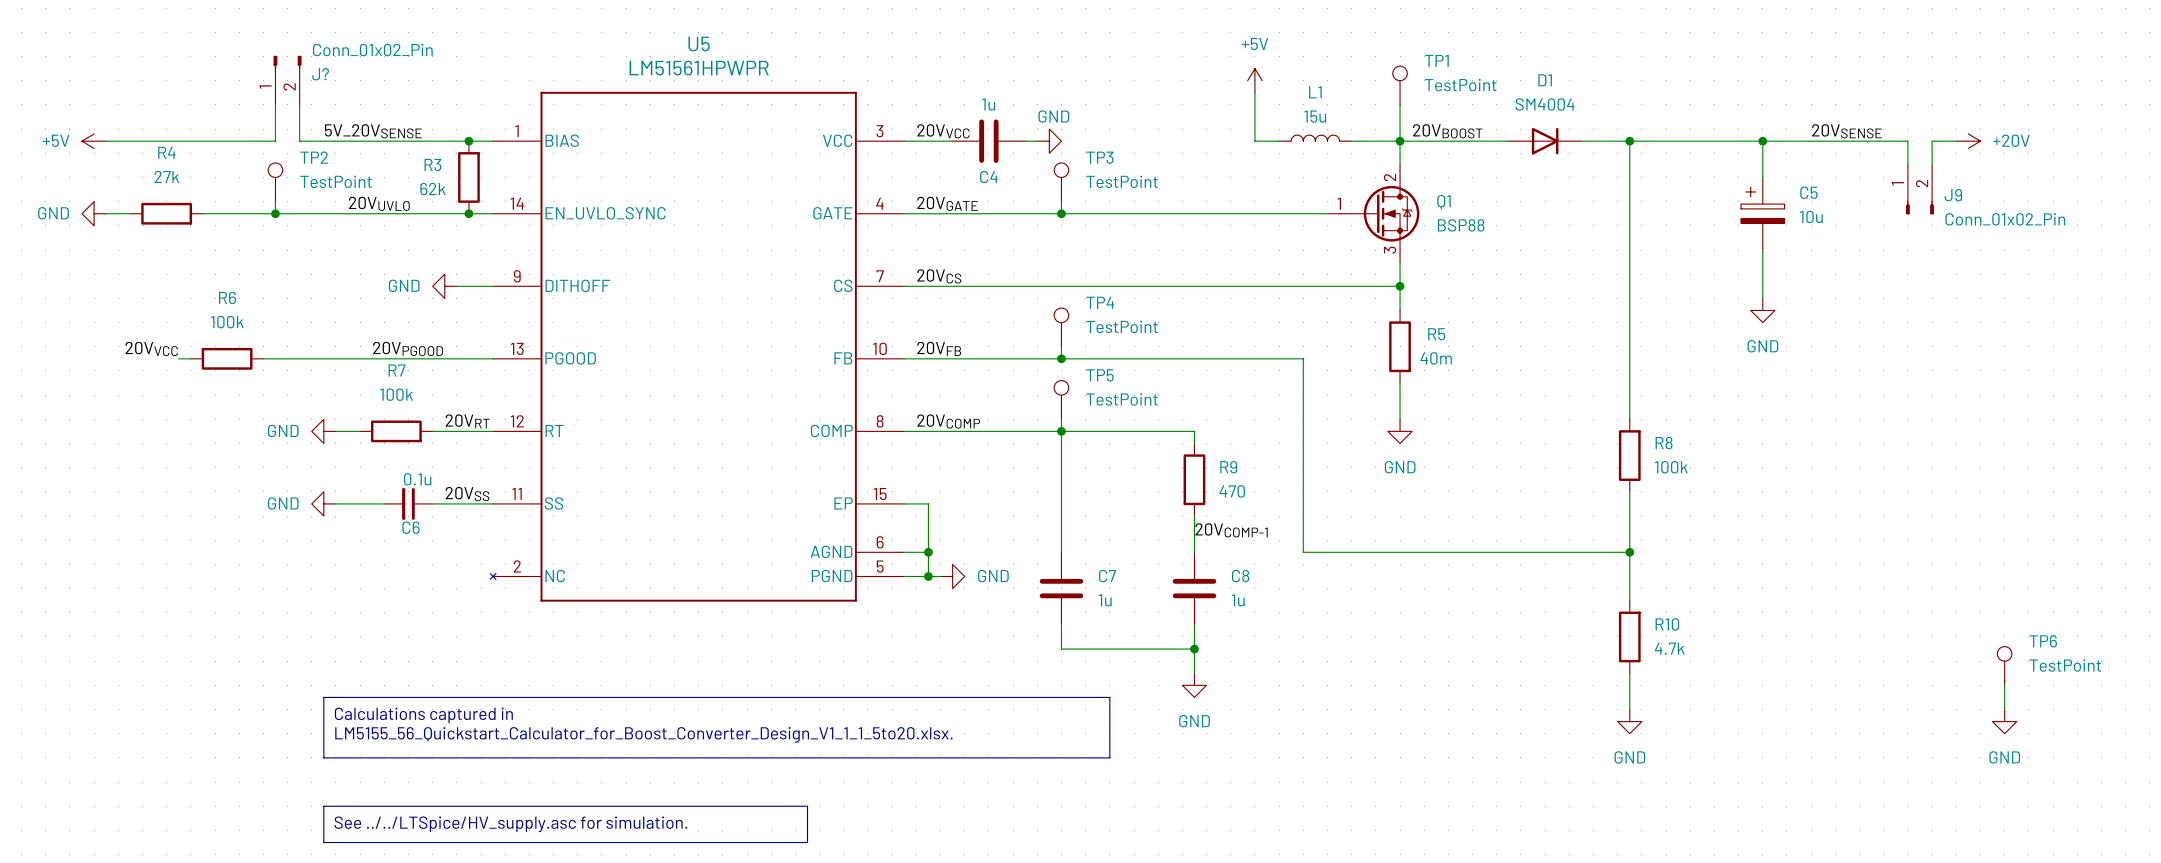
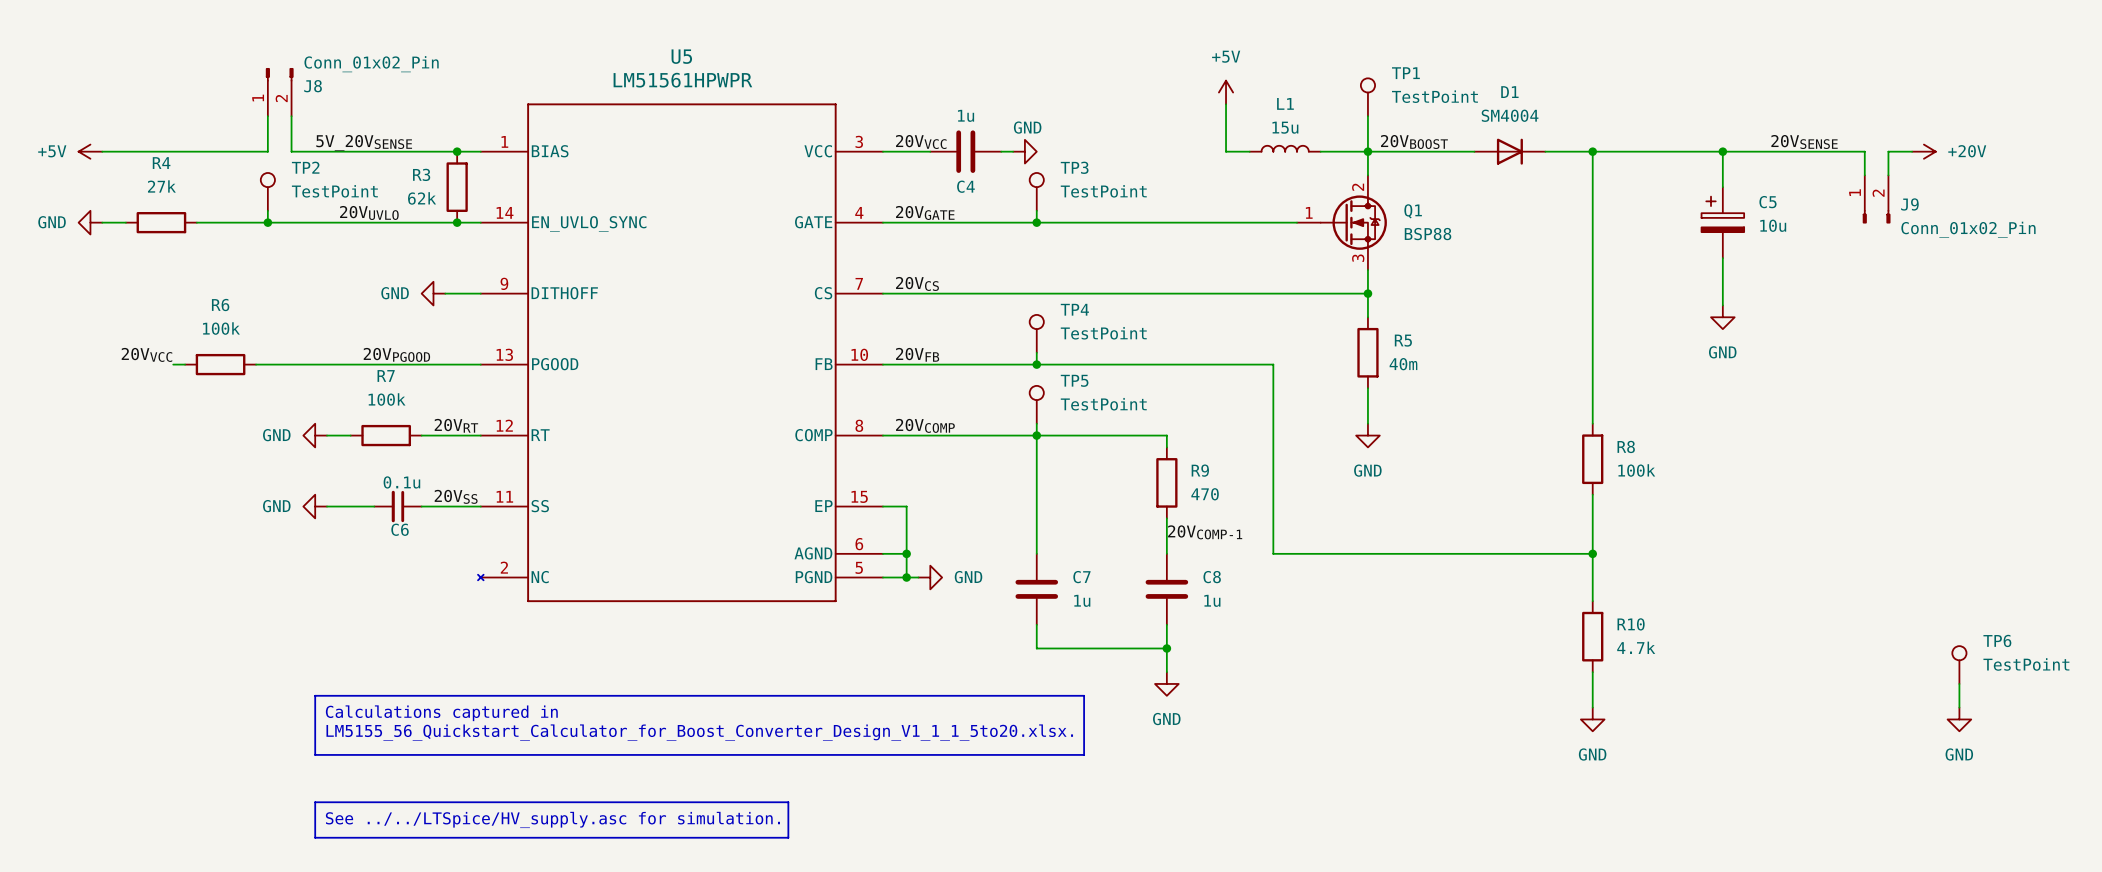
J? name: J? (320, 74) -> J8 (313, 86)

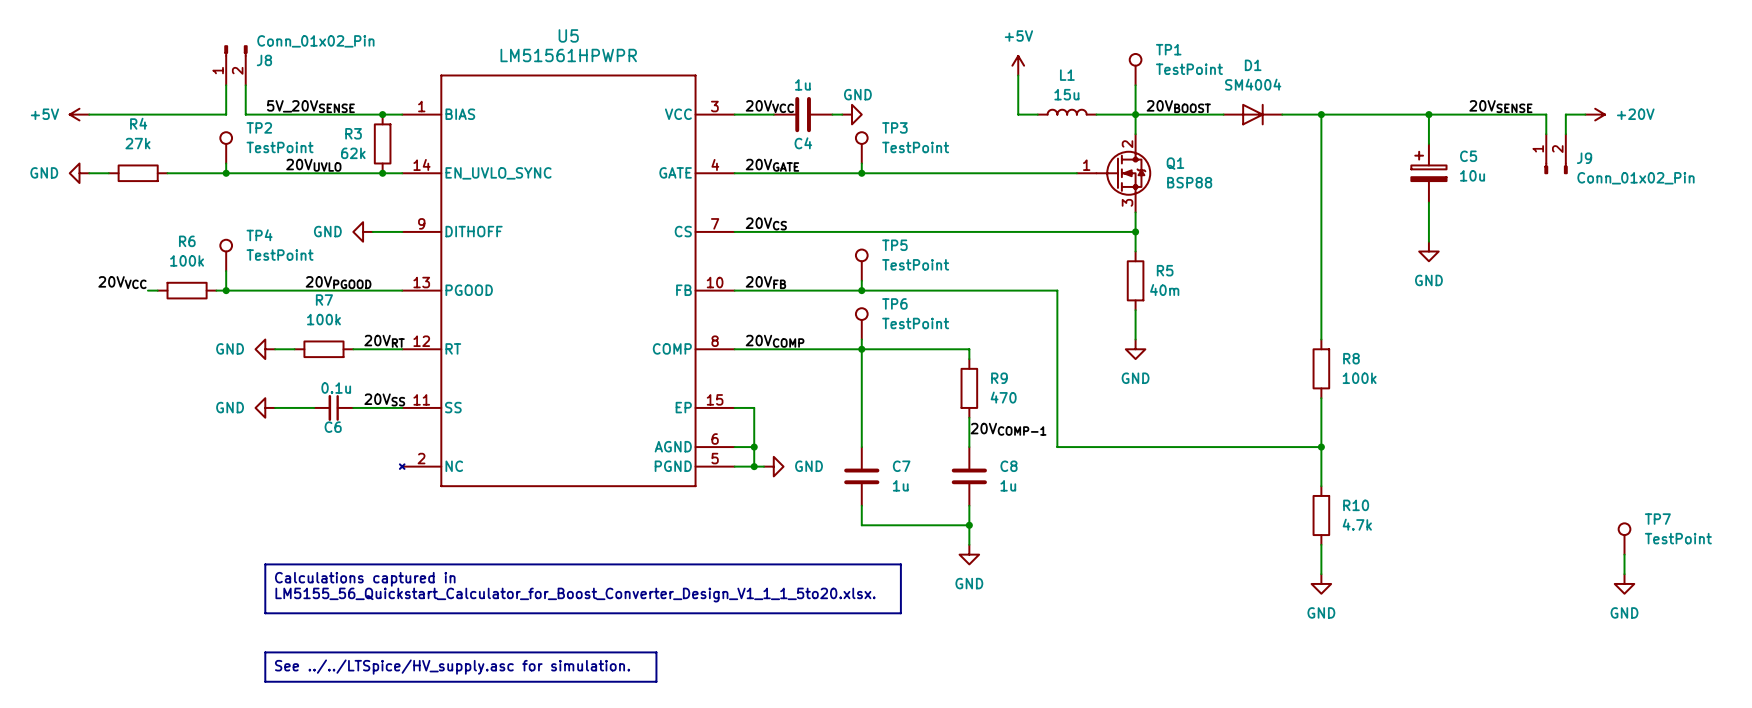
TP4 name: TP4 (1074, 309) -> TP5 (894, 245)
TP4: none -> TestPoint (226, 255)
wire: none -> (226, 271) (226, 290)
junction: none -> (226, 290)
TP5 name: TP5 (1074, 380) -> TP6 (894, 303)
TP6 name: TP6 (1997, 640) -> TP7 (1657, 519)

